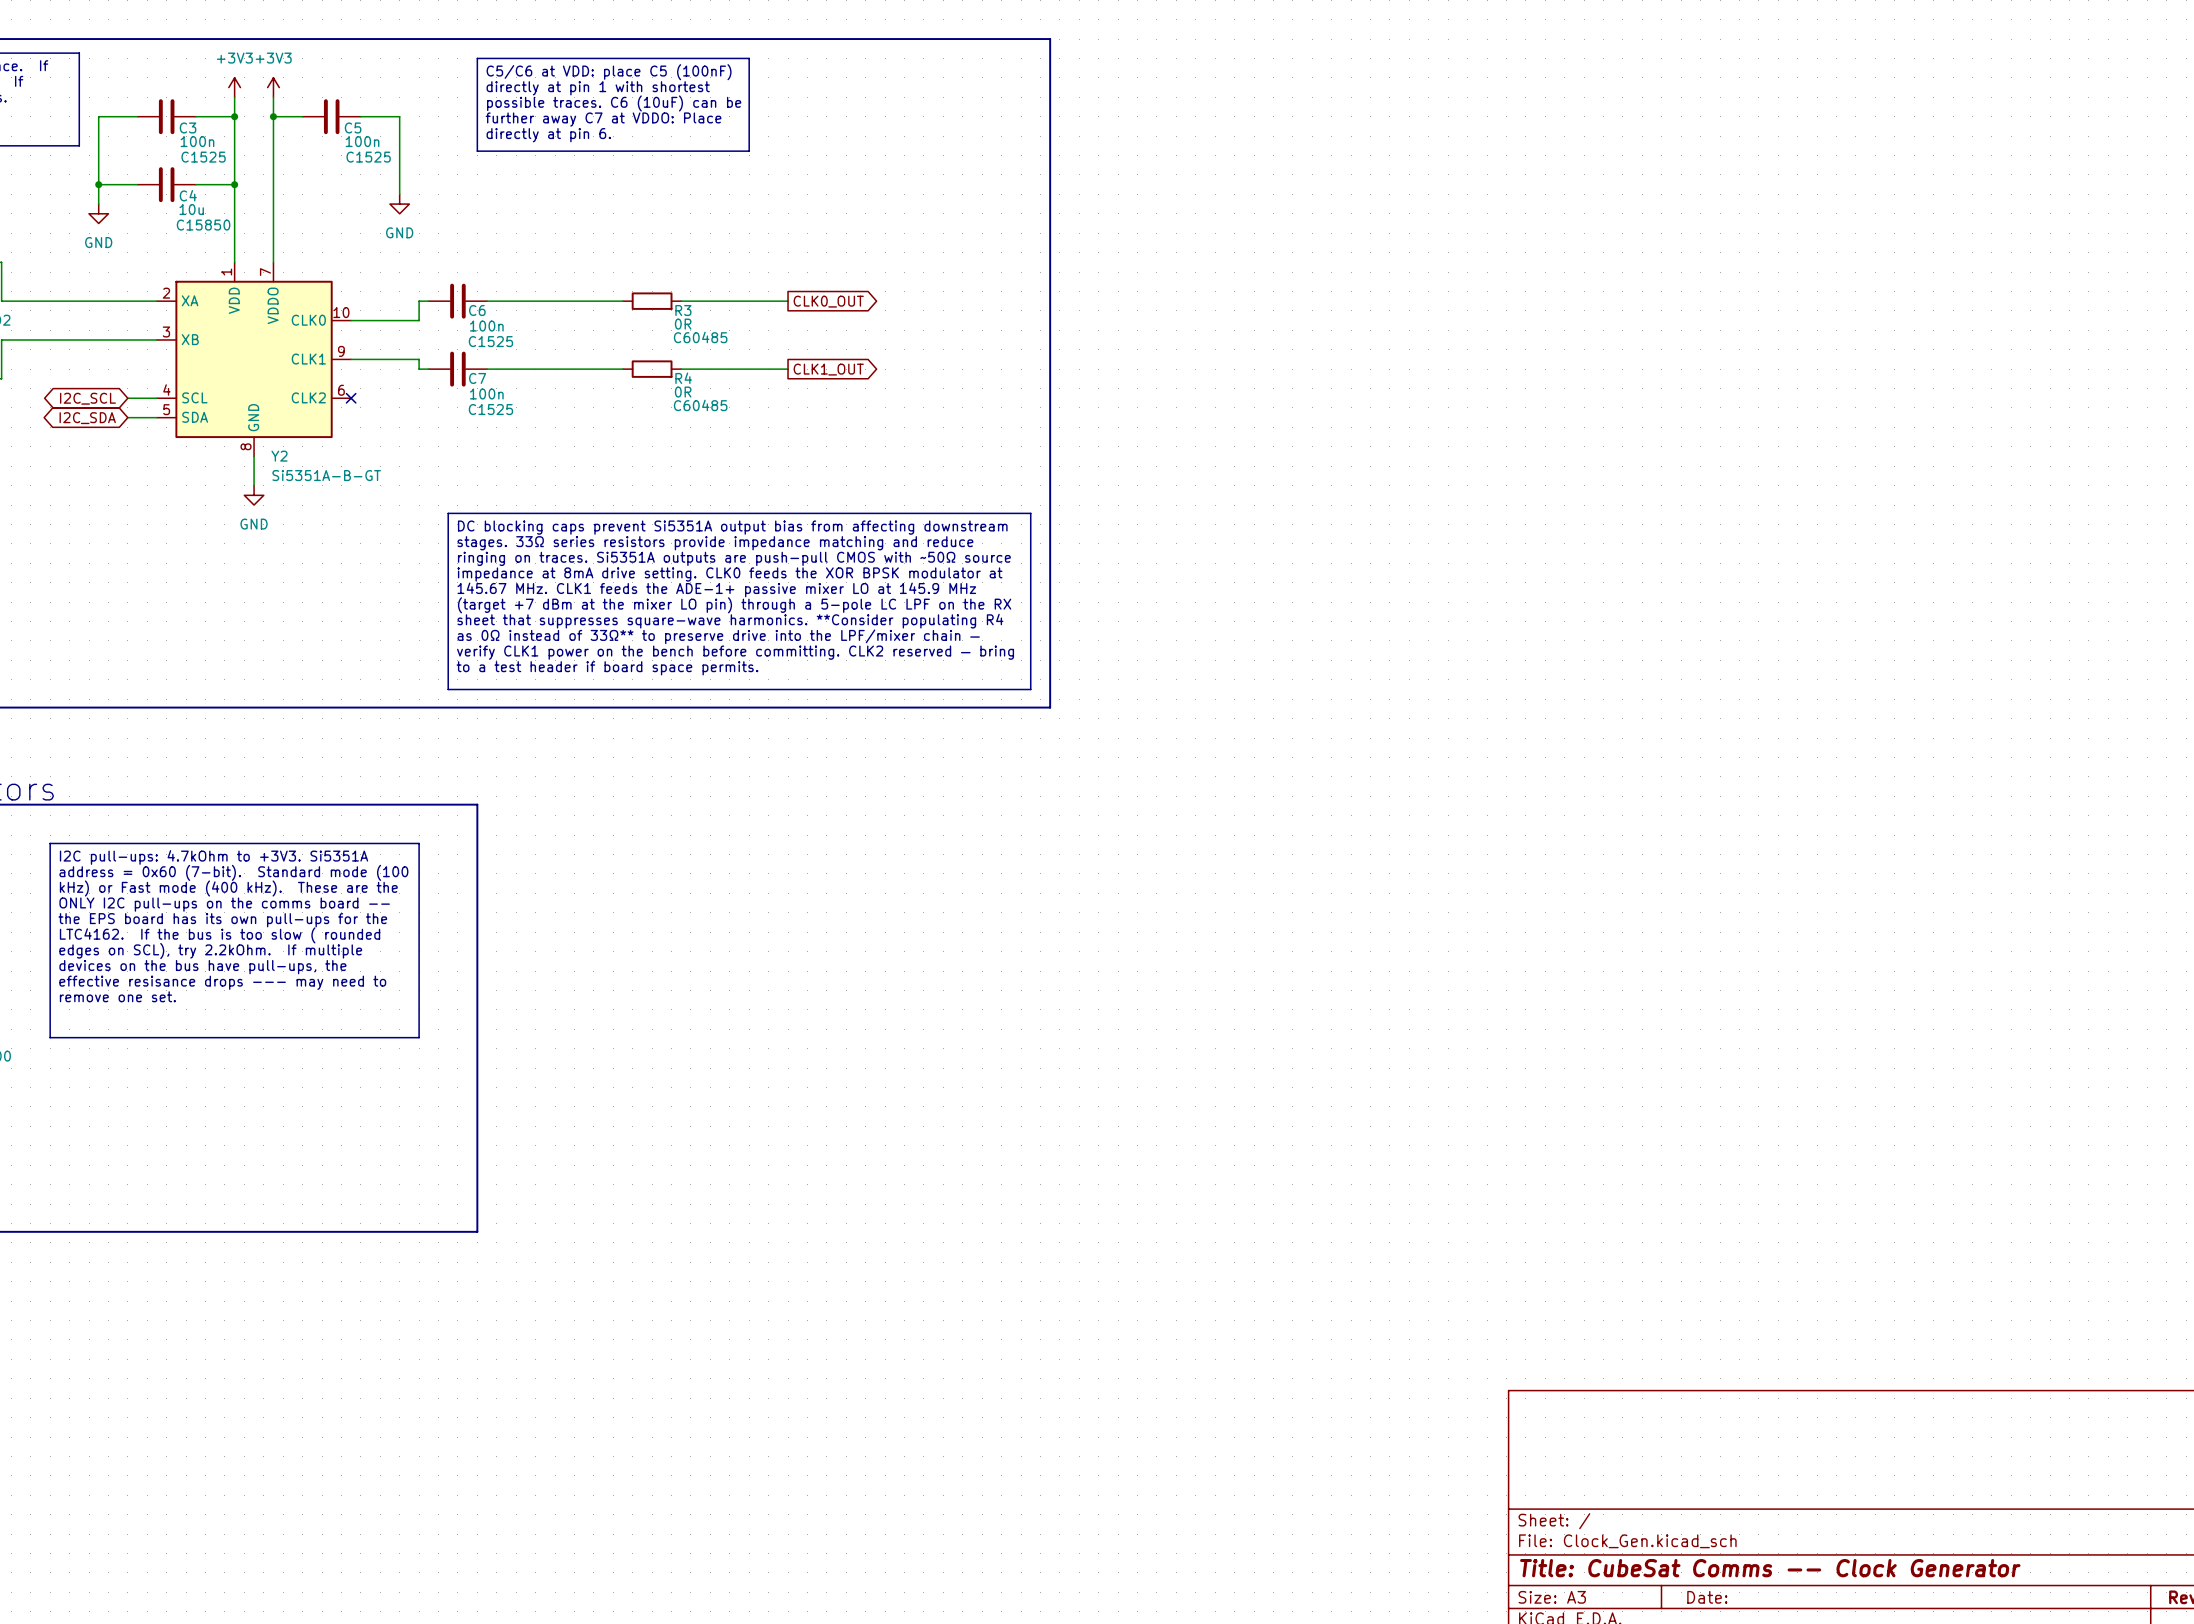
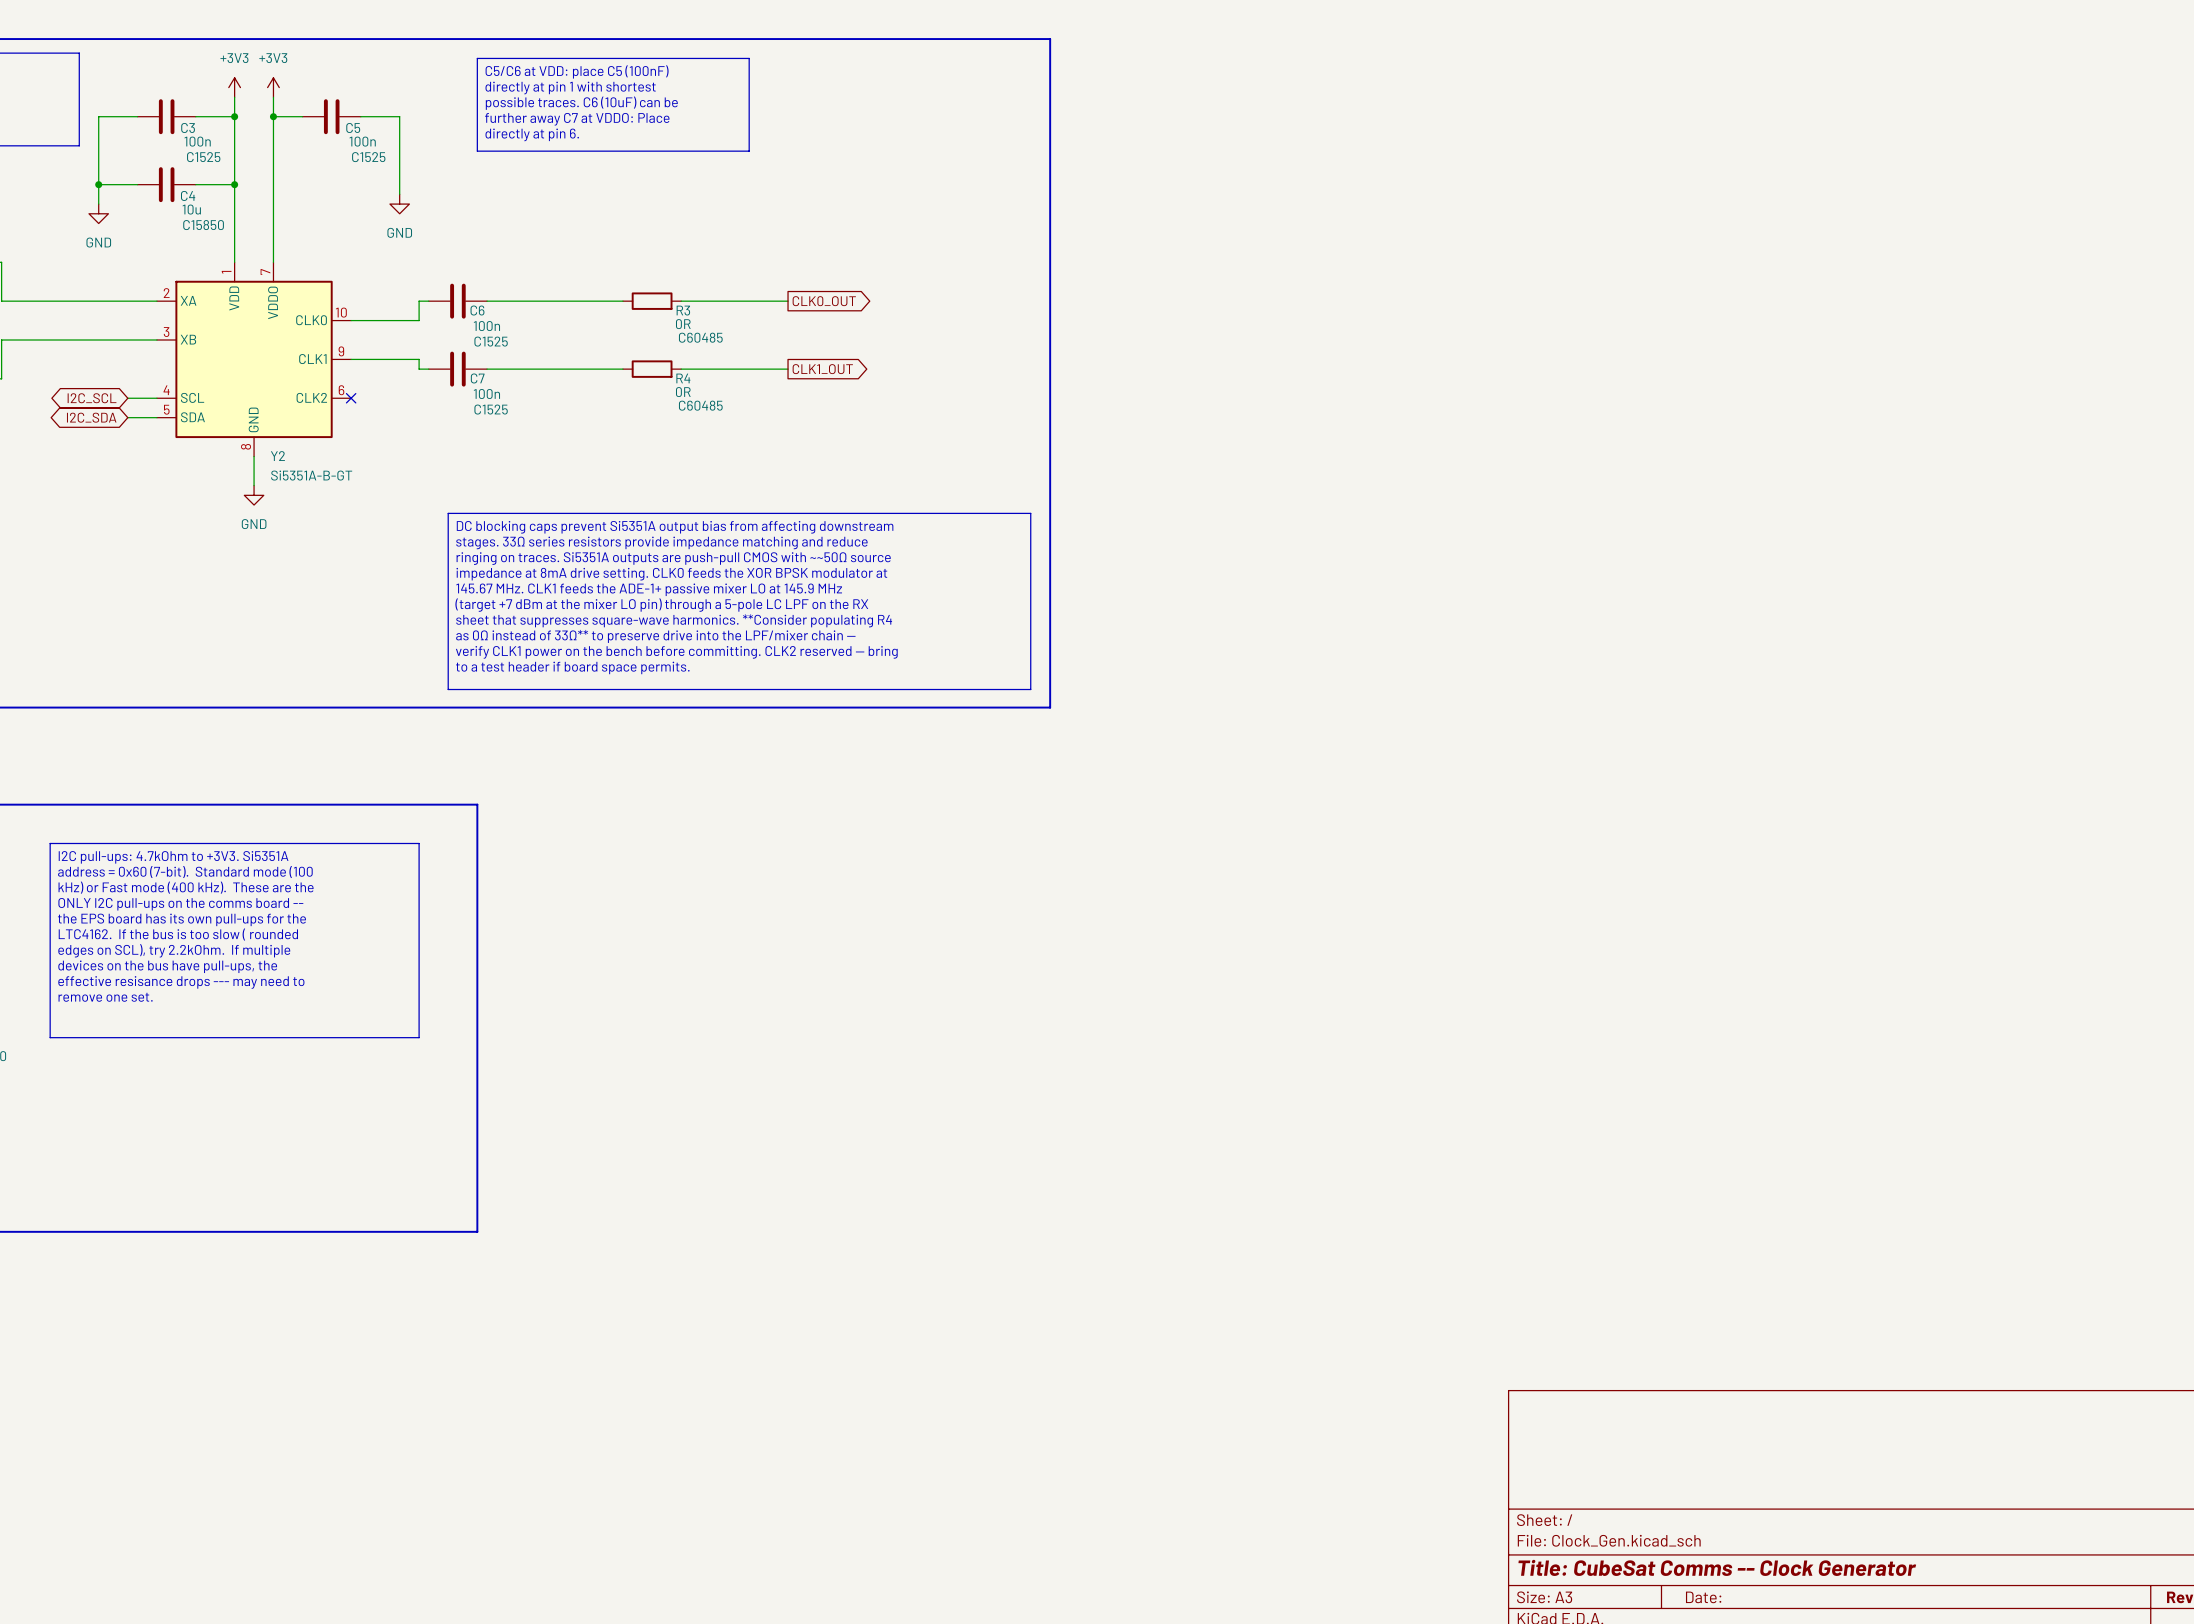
text: ringing on traces. Si5351A outputs are push-pull CMOS with ~50Ω source (734, 558) -> ringing on traces. Si5351A outputs are push-pull CMOS with ~~50Ω source (673, 558)

